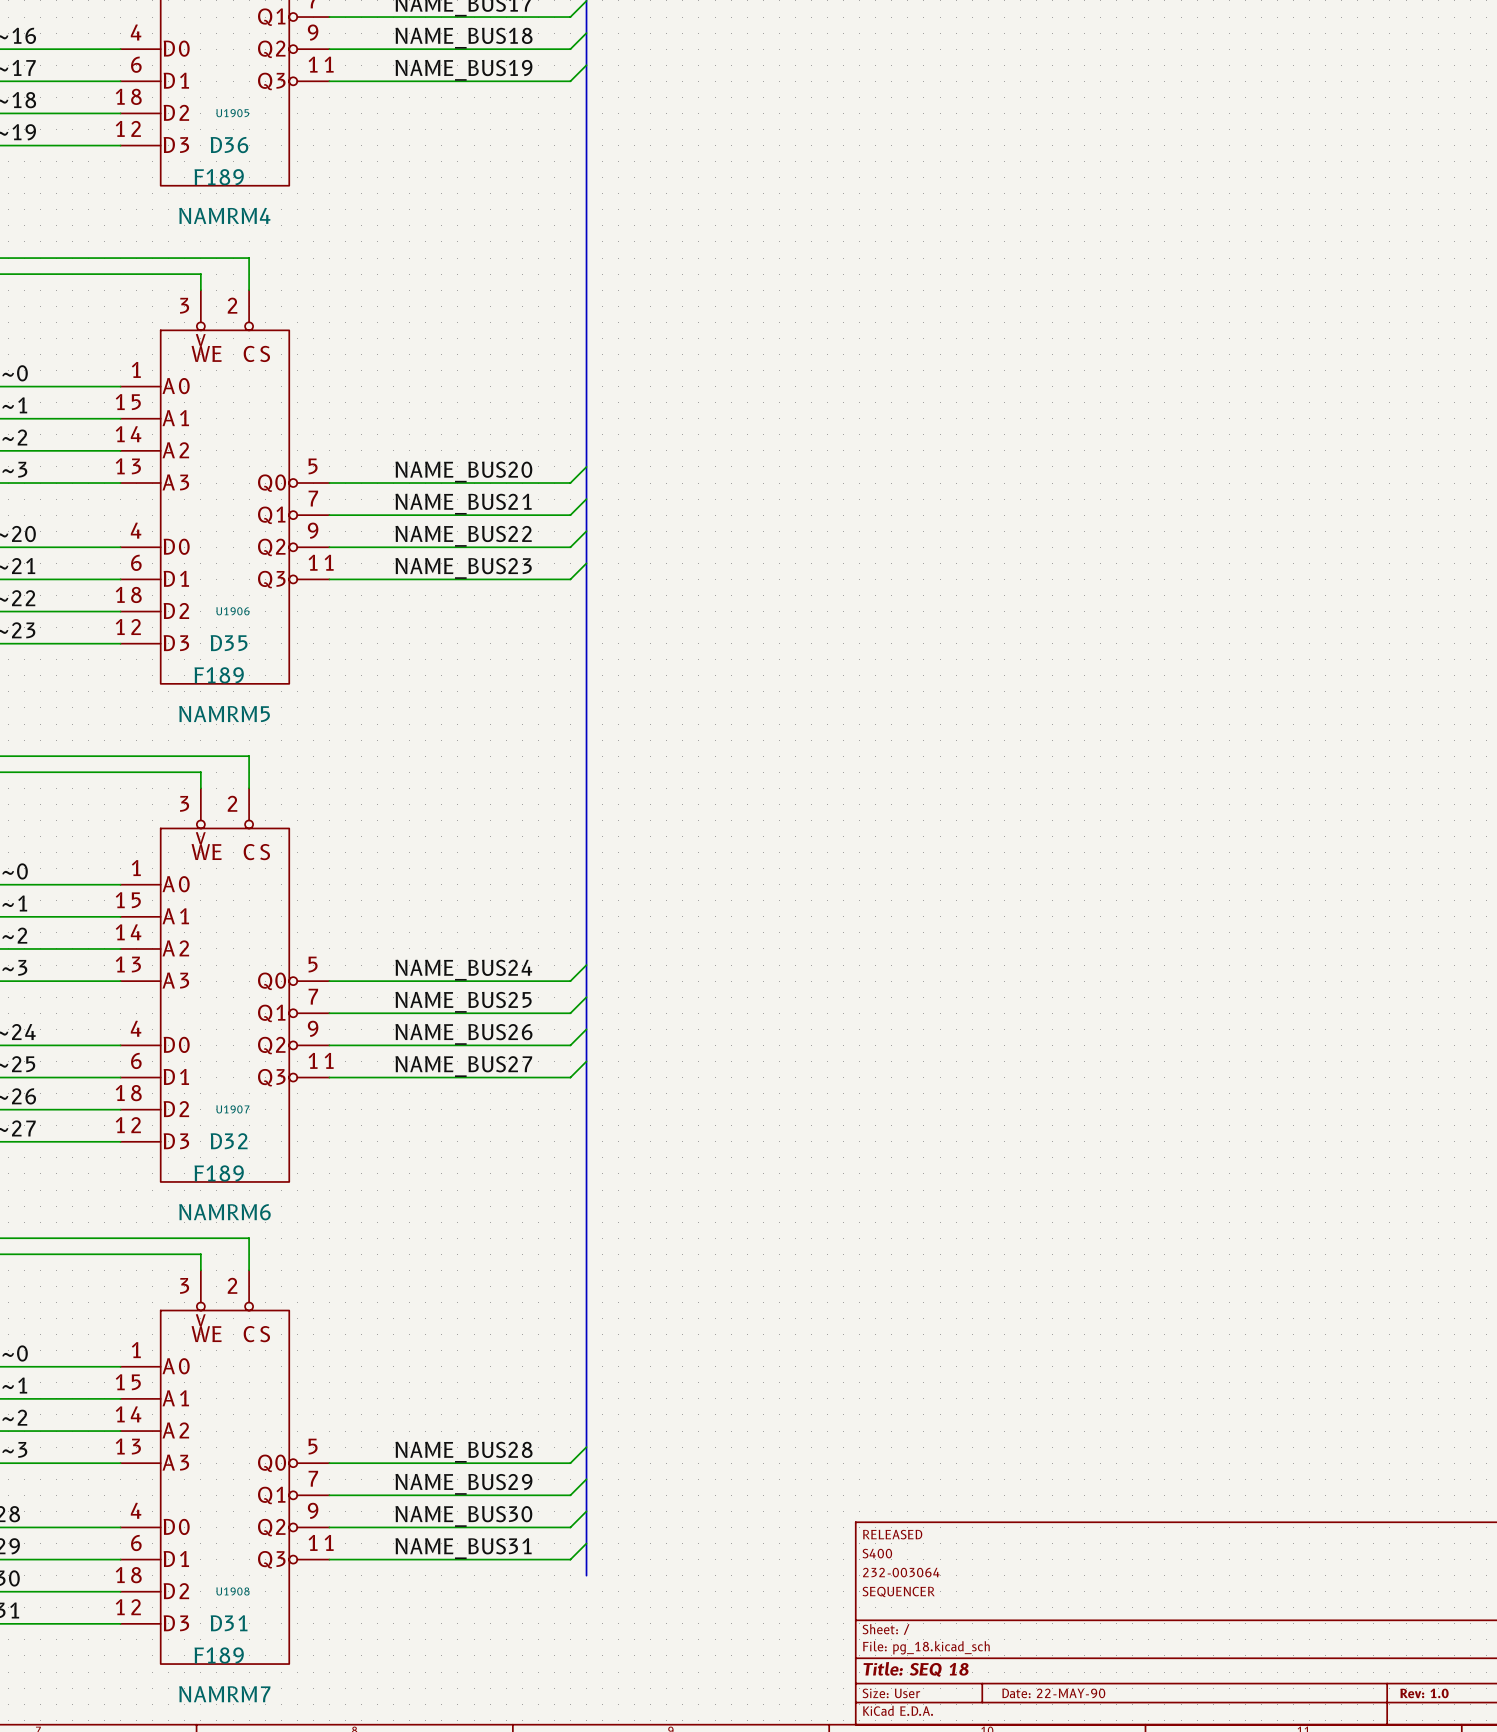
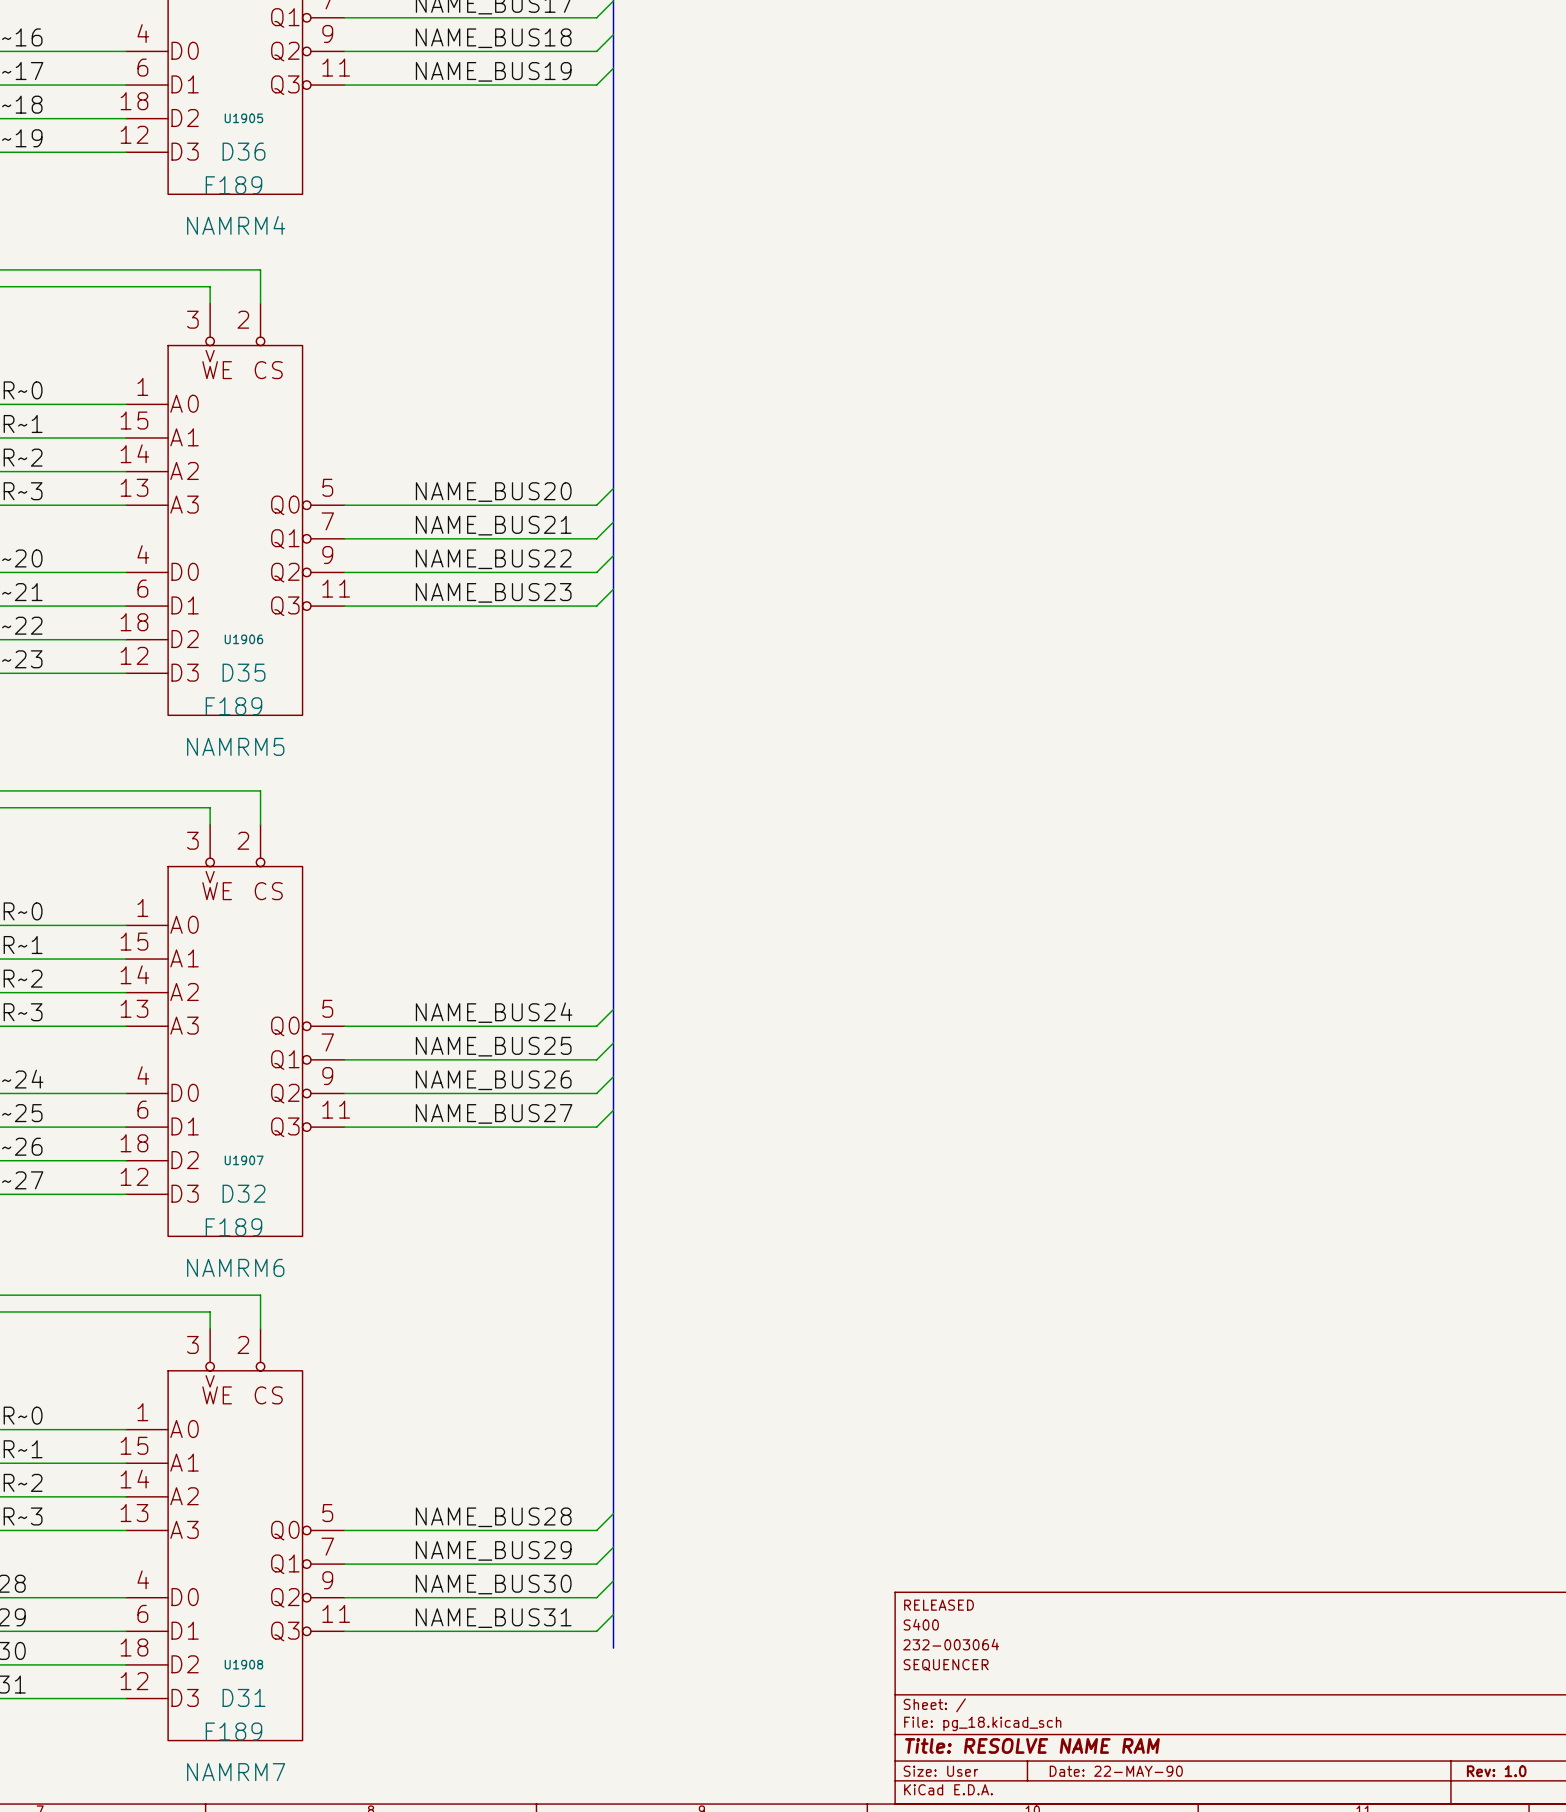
title block: Title: SEQ 18 (916, 1669) -> Title: RESOLVE NAME RAM (1032, 1745)

